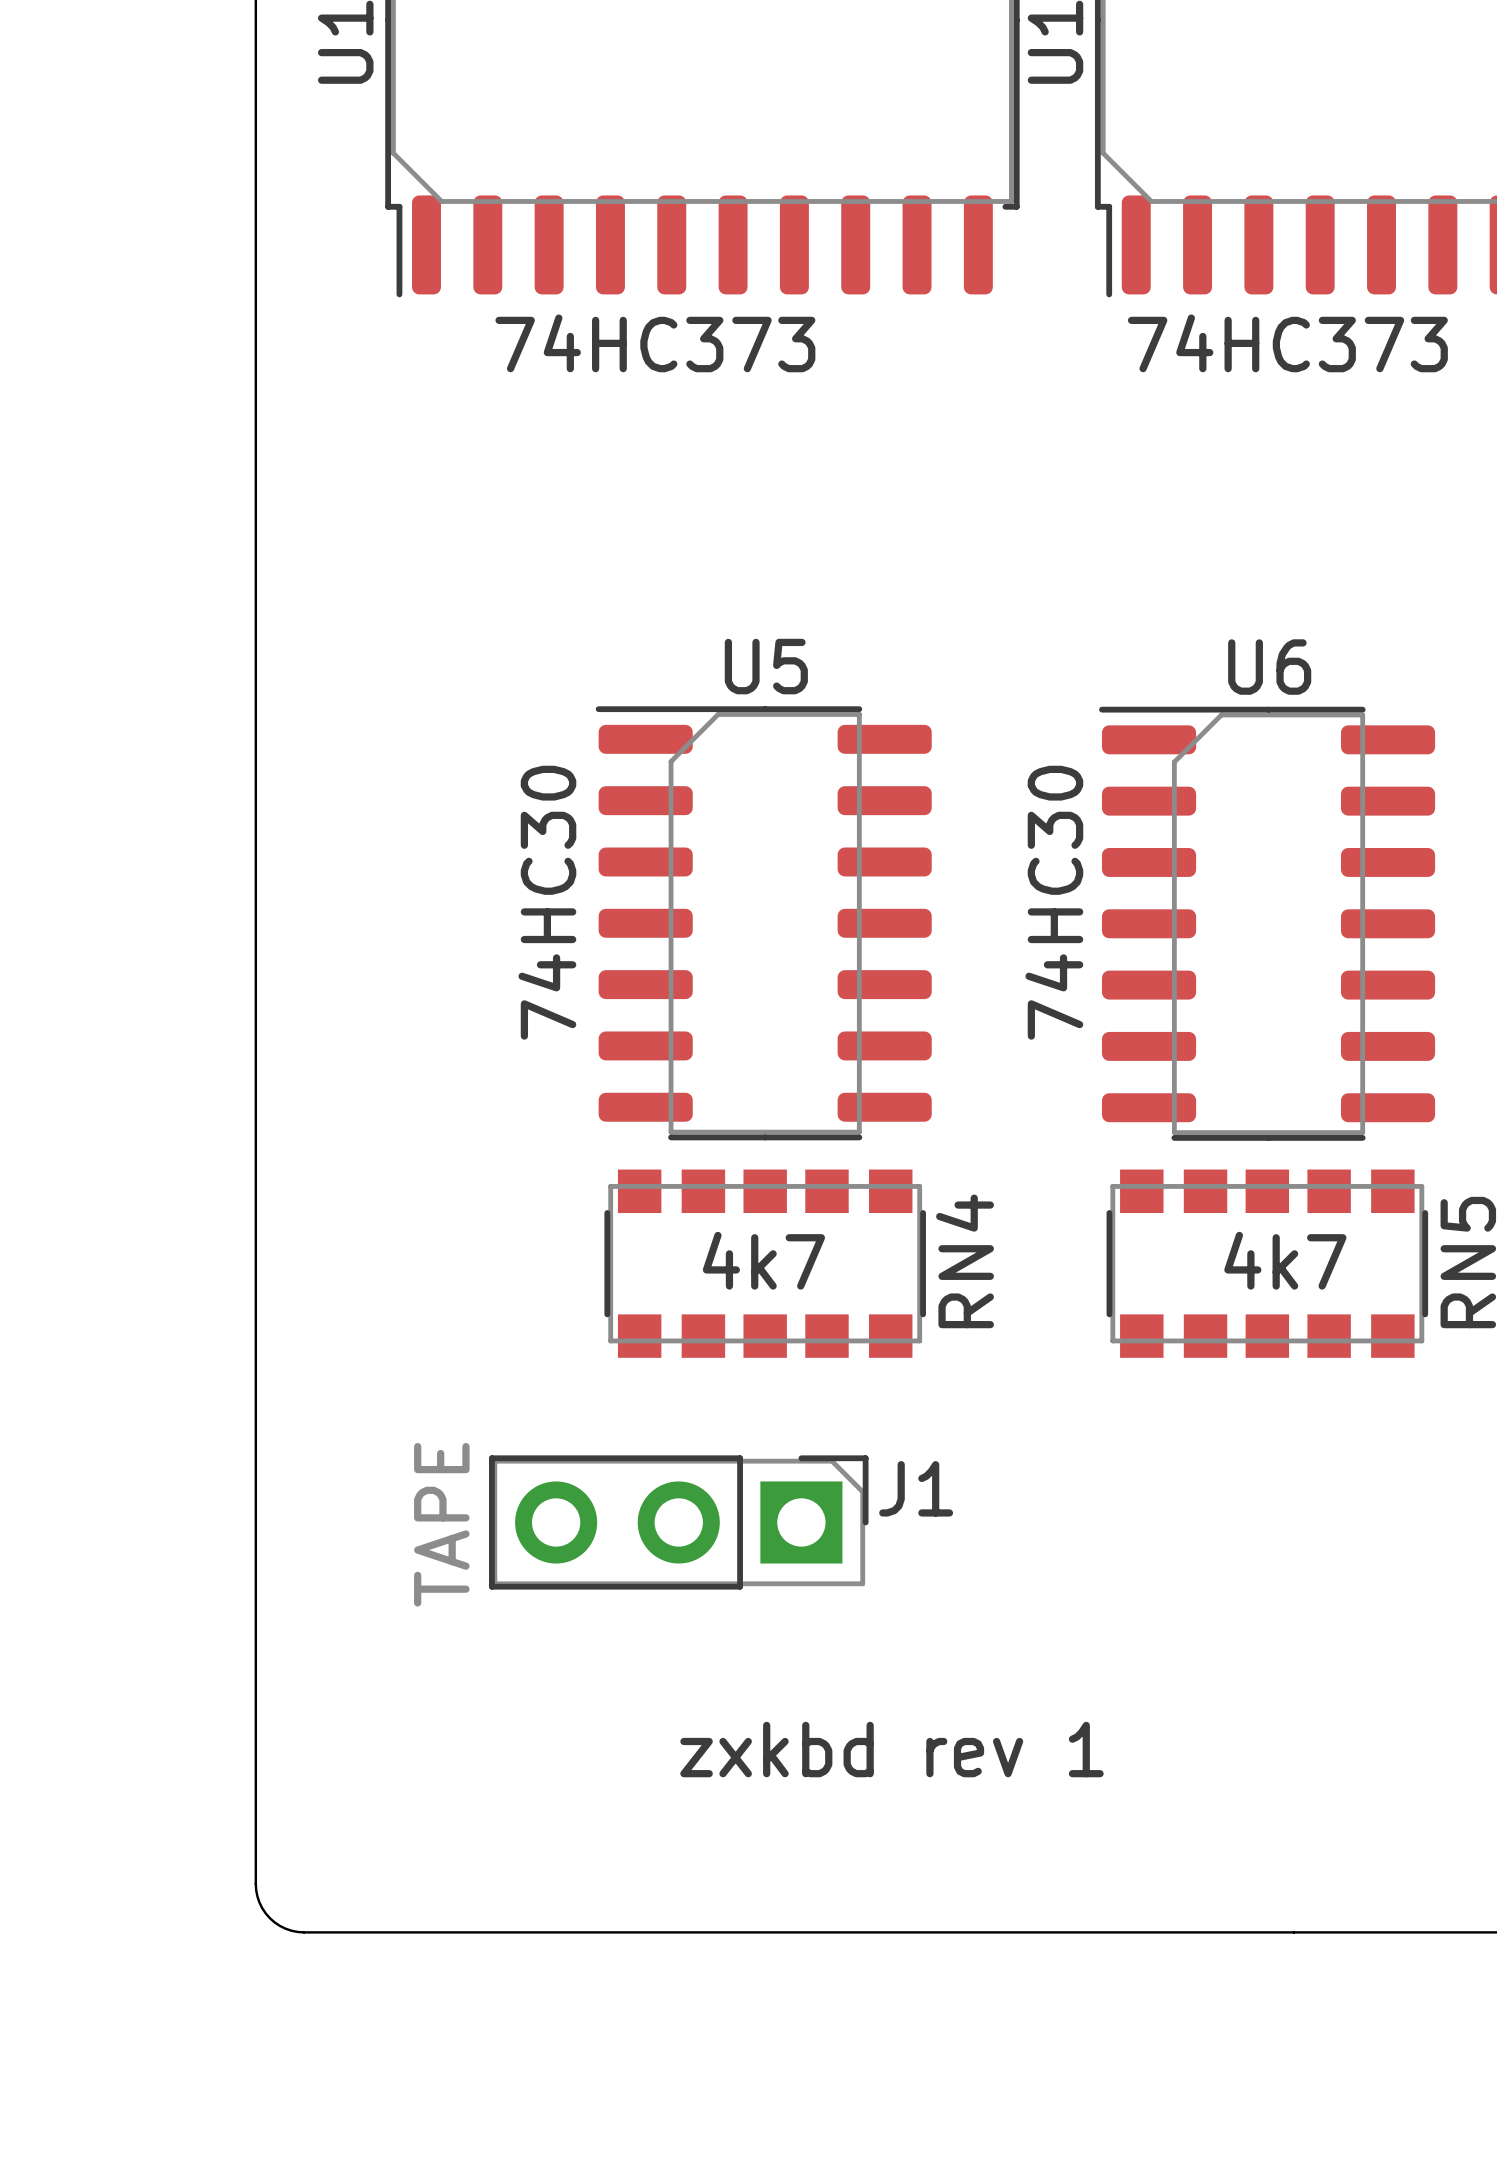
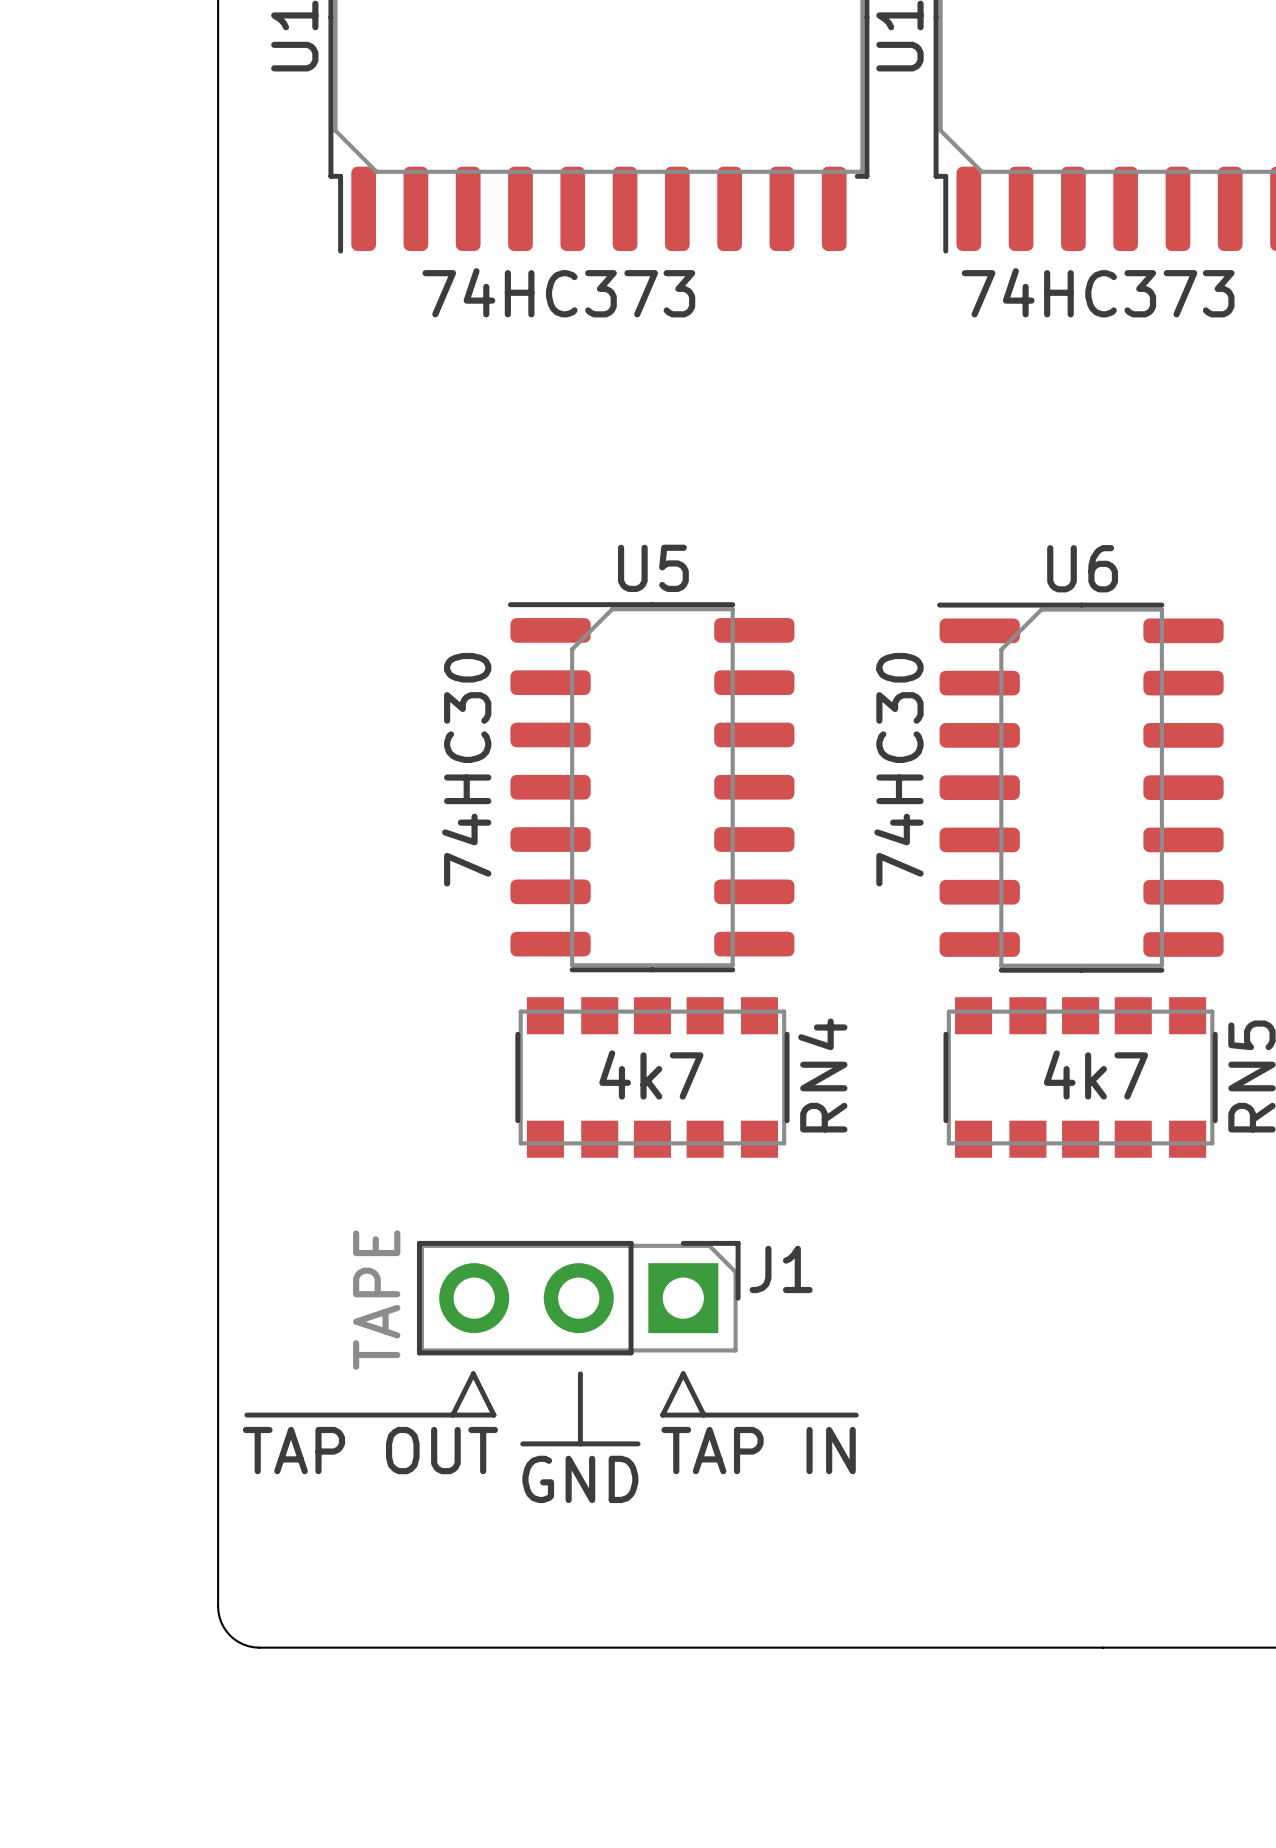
line: none -> (580, 1373) (580, 1443)
line: none -> (246, 1415) (493, 1415) (473, 1373) (452, 1415)
line: none -> (703, 1415) (683, 1373) (662, 1415) (856, 1415)
line: none -> (522, 1443) (638, 1443)
text: none -> TAP OUT (370, 1450)
text: none -> GND (580, 1479)
text: zxkbd rev 1 (891, 1749) -> TAP IN (758, 1450)

